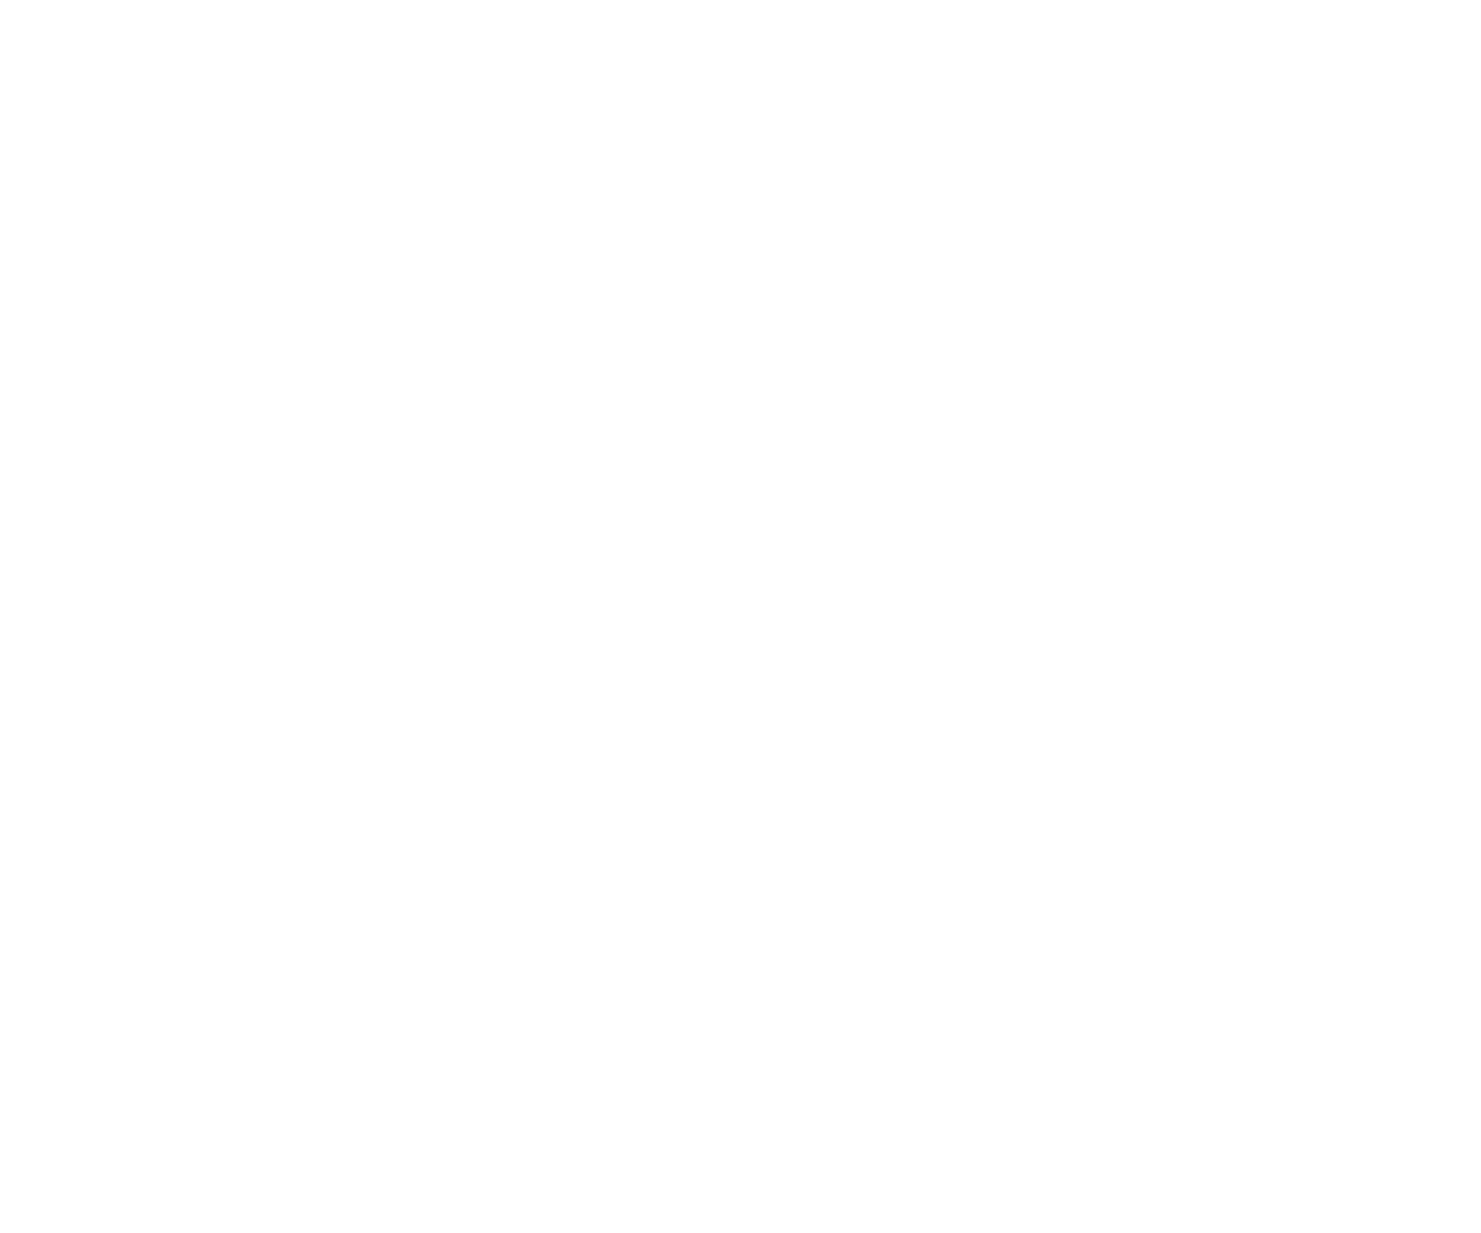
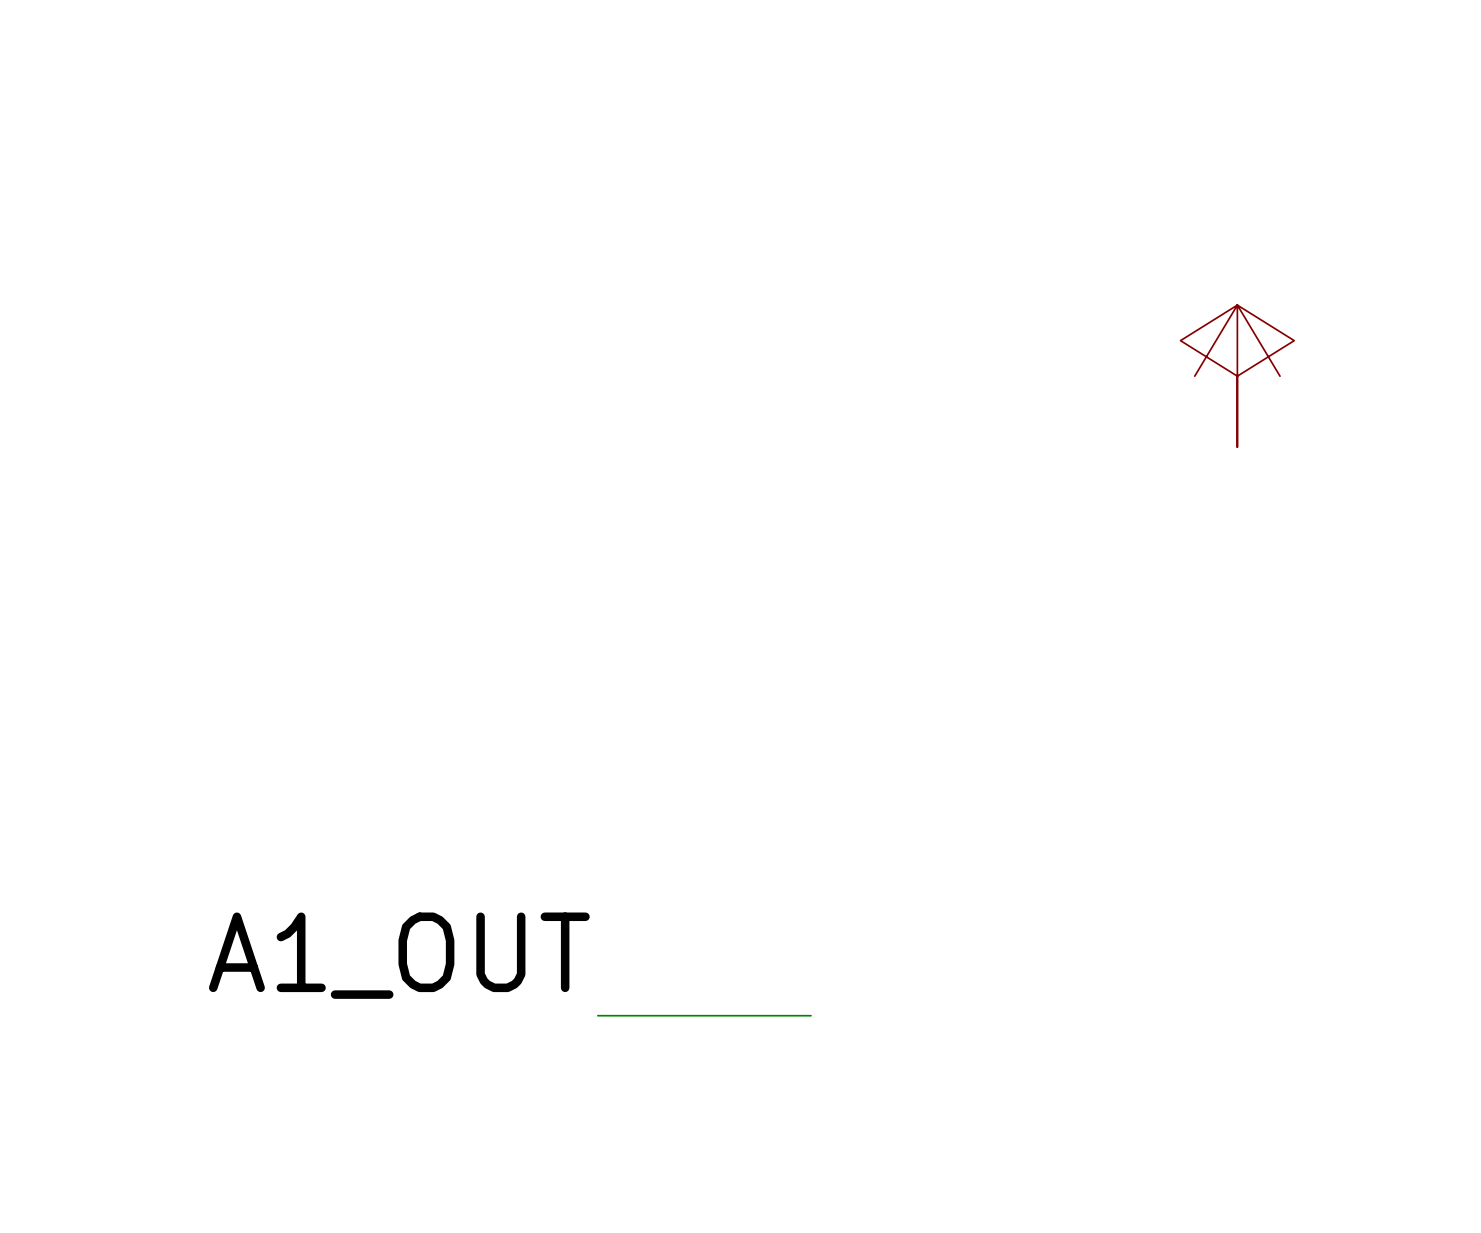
power symbol: none -> (1237, 376)
power symbol: none -> (1237, 376)
label: none -> A1_OUT (399, 955)
wire: none -> (597, 1015) (811, 1015)

